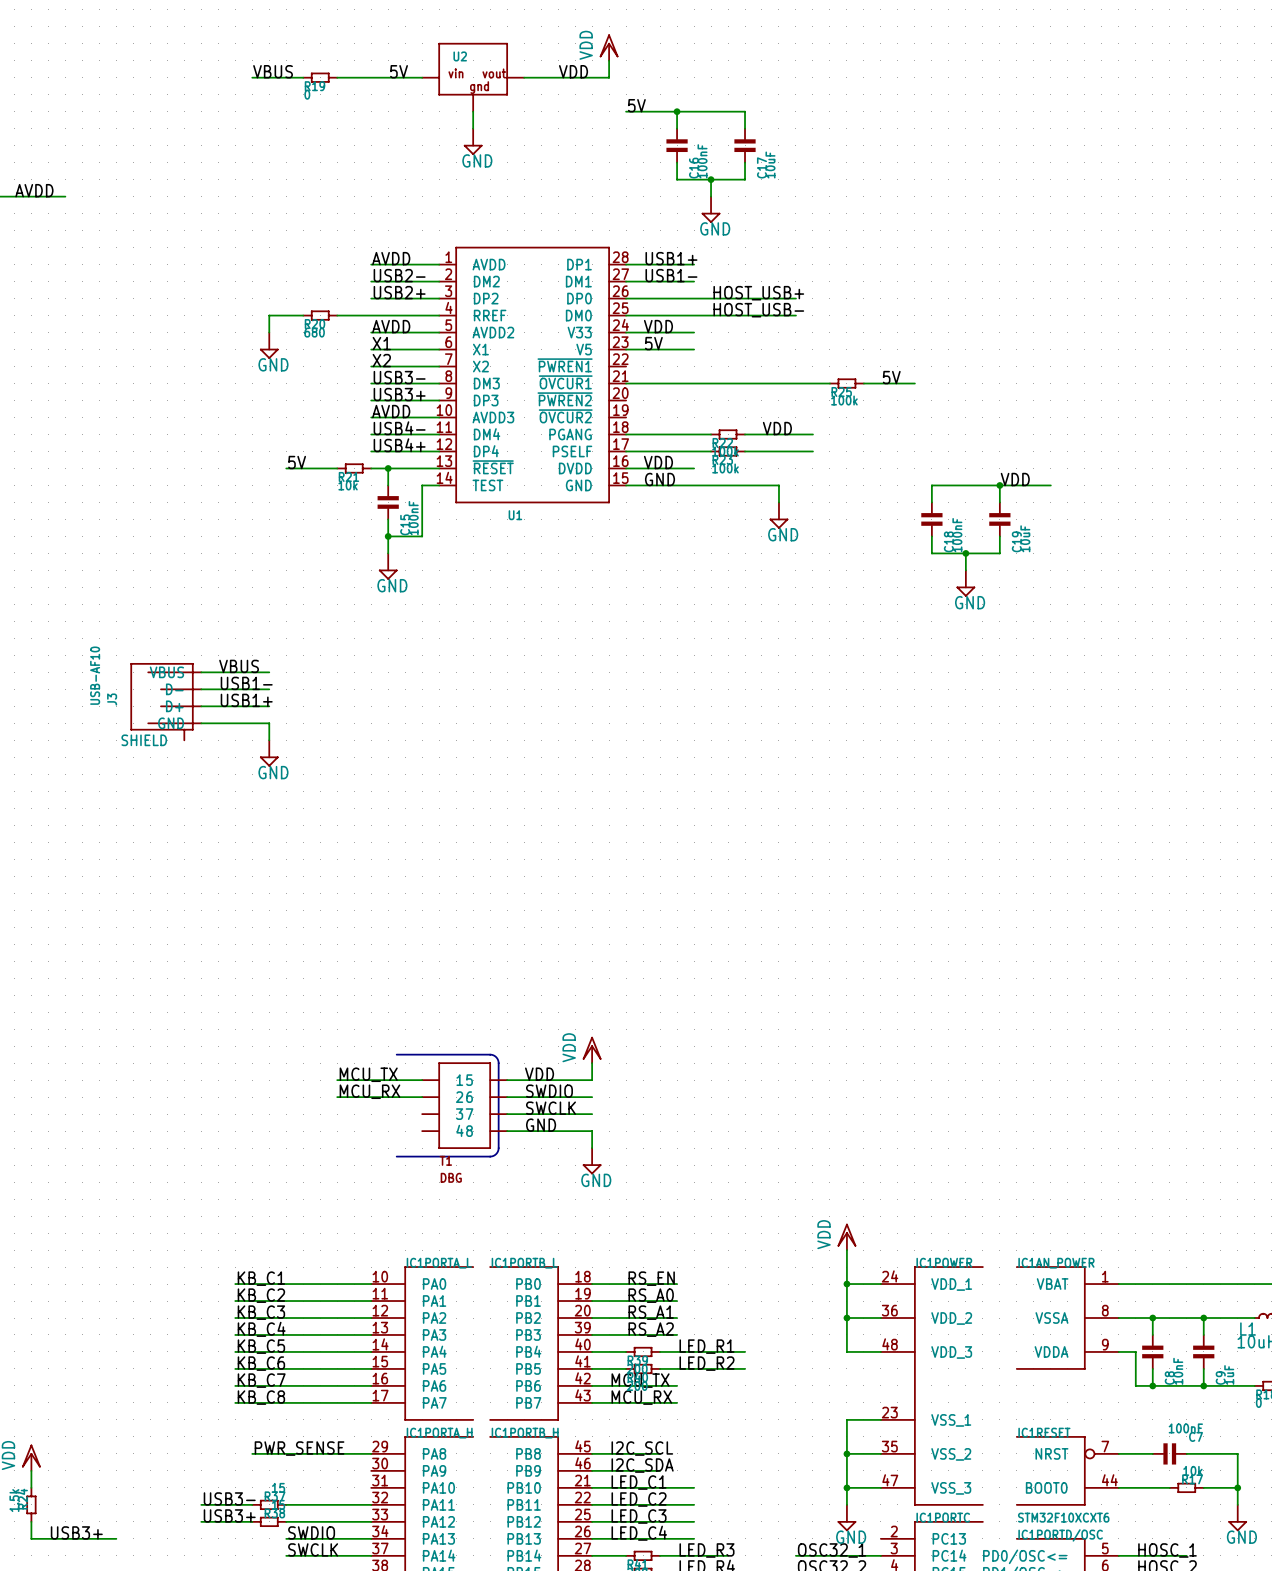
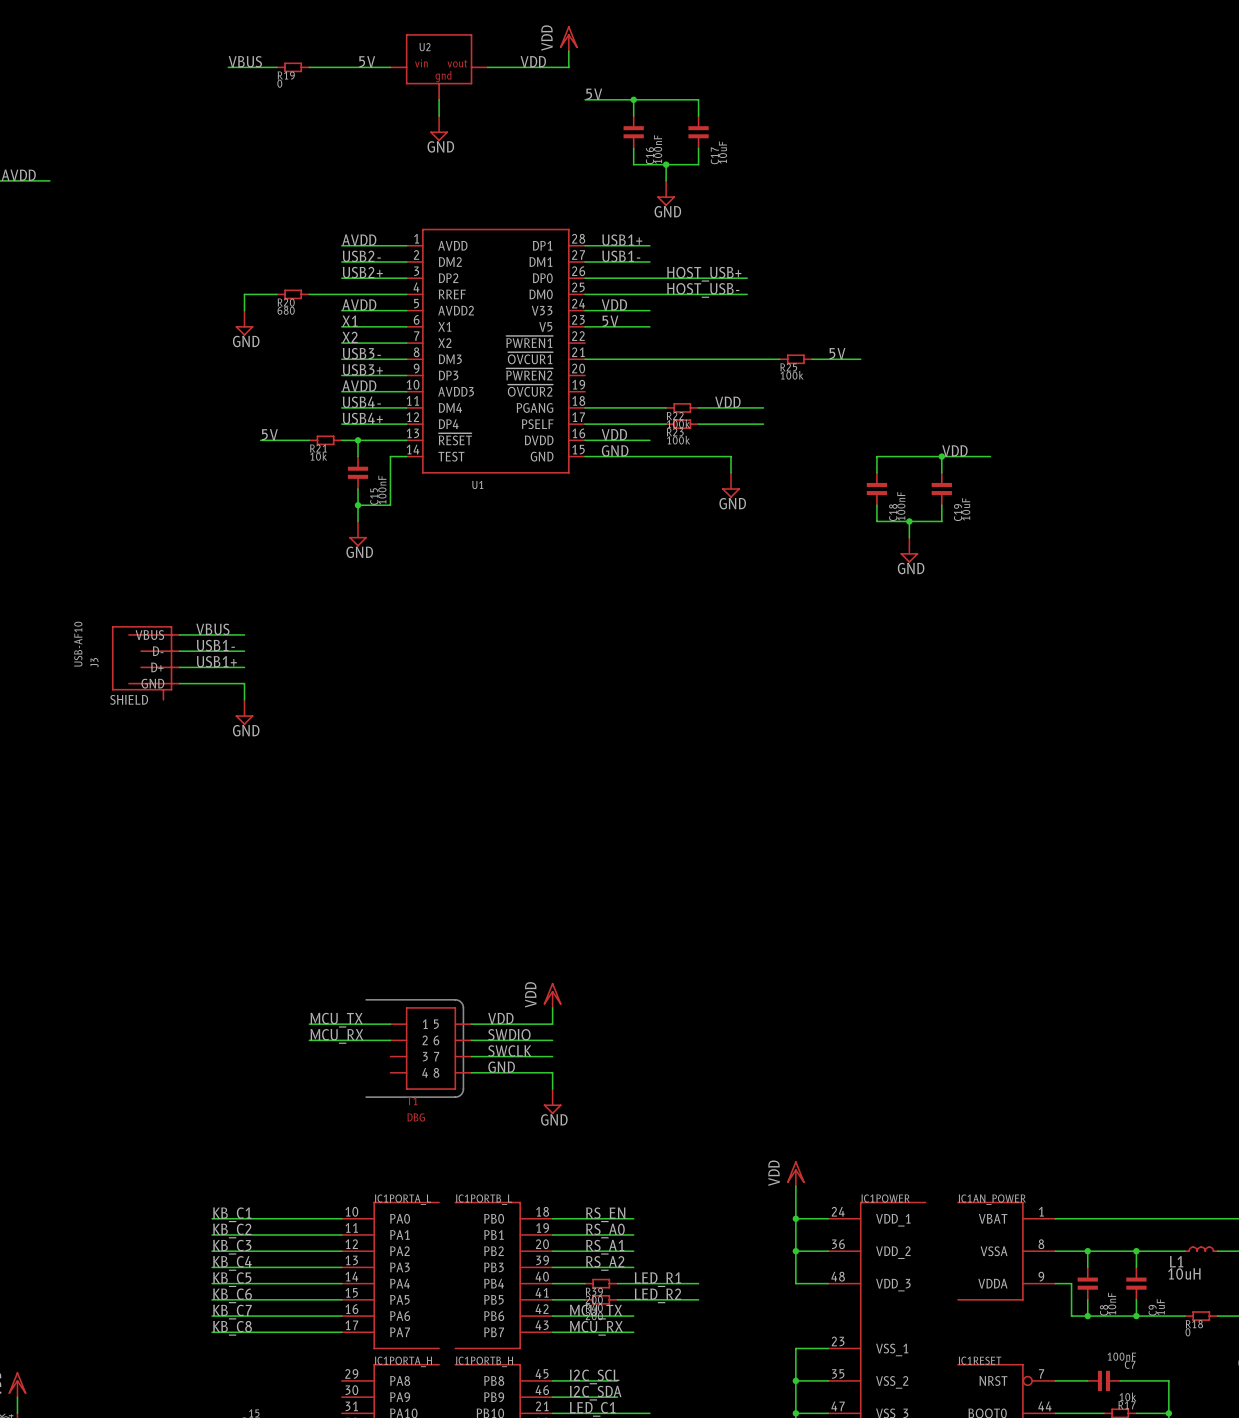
label: PWR_SENSE (299, 1448) -> none
wire: (252, 1453) (371, 1453) -> none

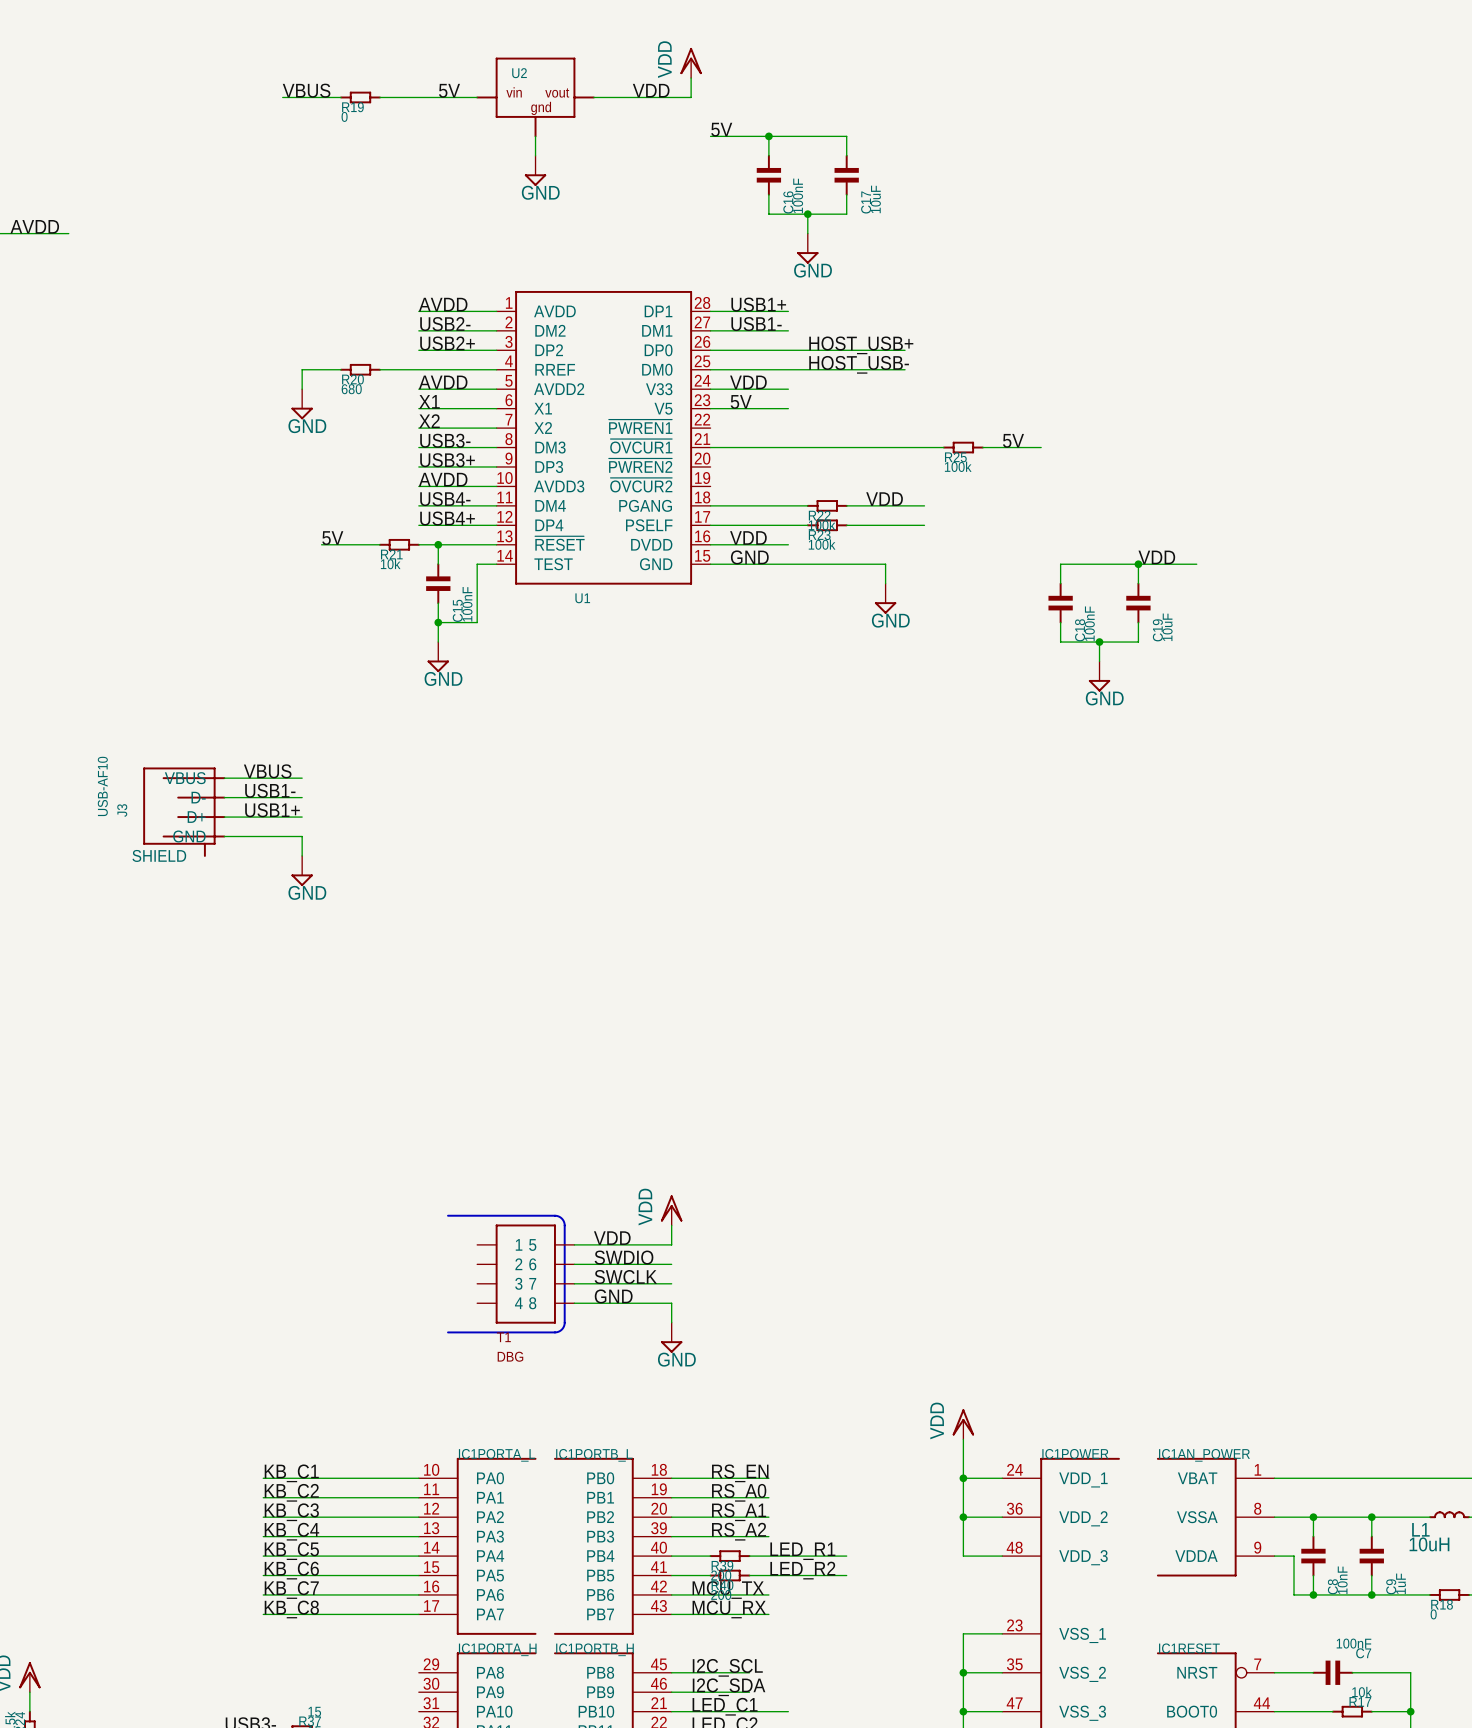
label: MCU_TX (336, 1020) -> none
wire: (309, 1024) (390, 1024) -> none
label: MCU_RX (336, 1036) -> none
wire: (309, 1040) (390, 1040) -> none

